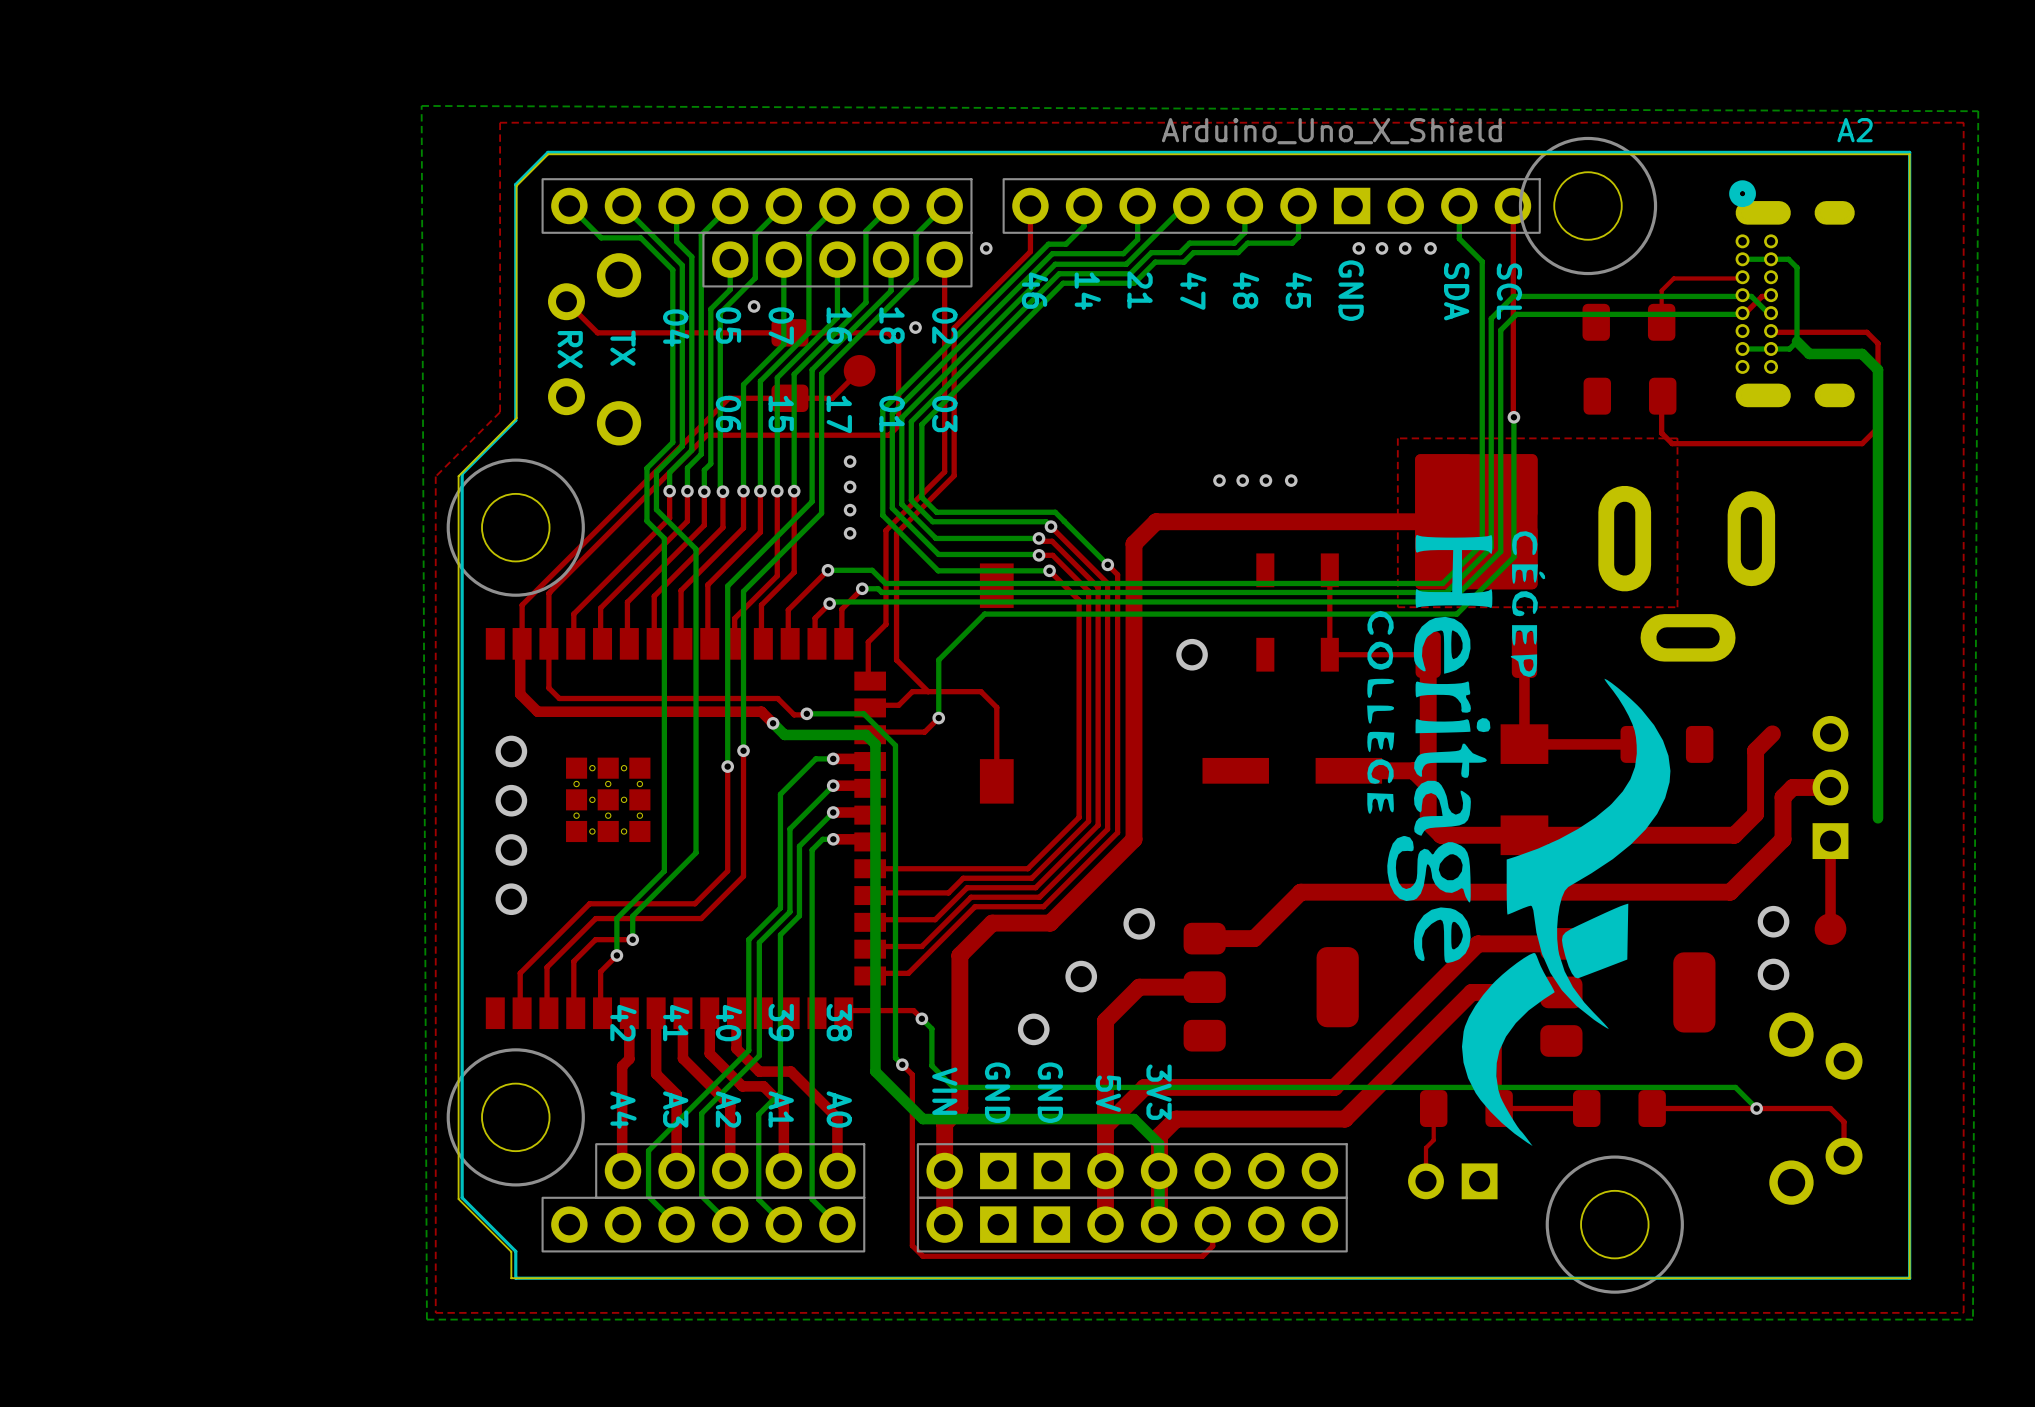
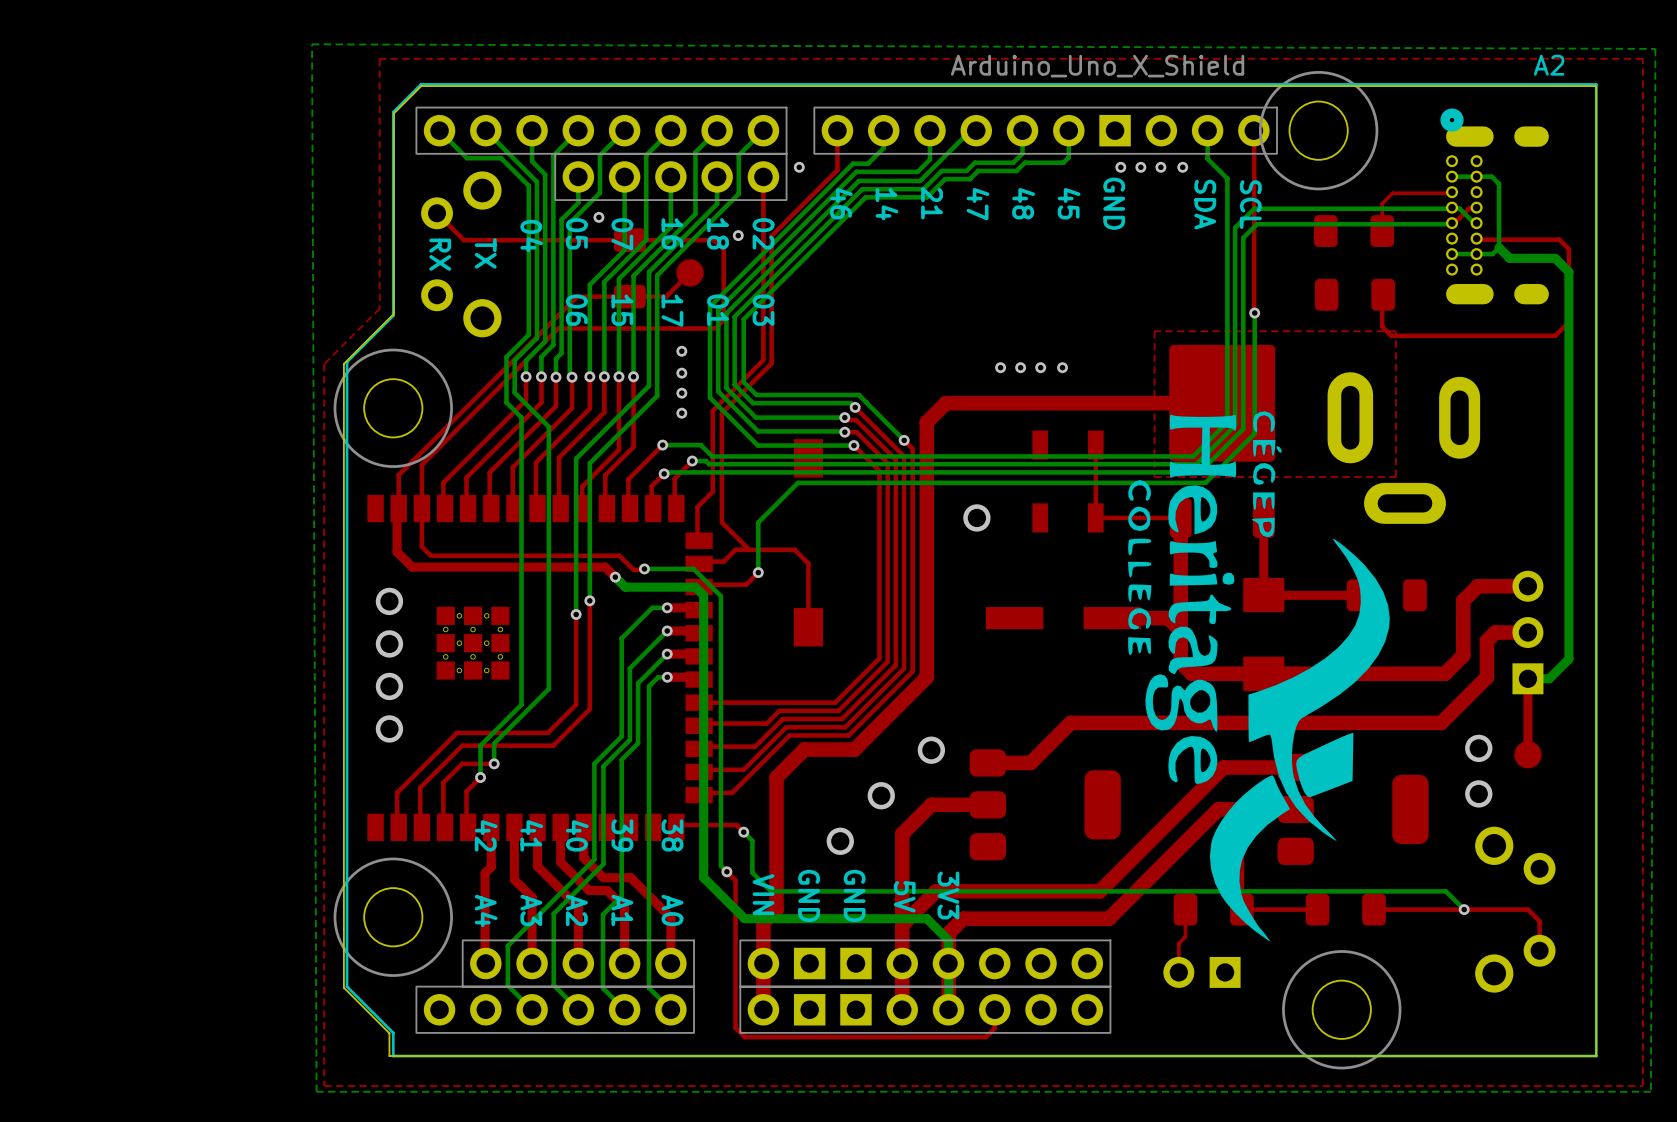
top track: none -> (1527, 586) (1477, 586)
bottom track: none -> (1568, 659) (1549, 678) (1527, 678)

